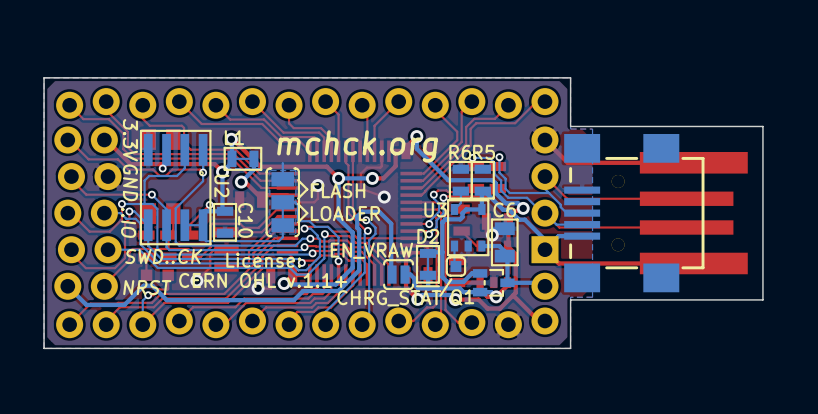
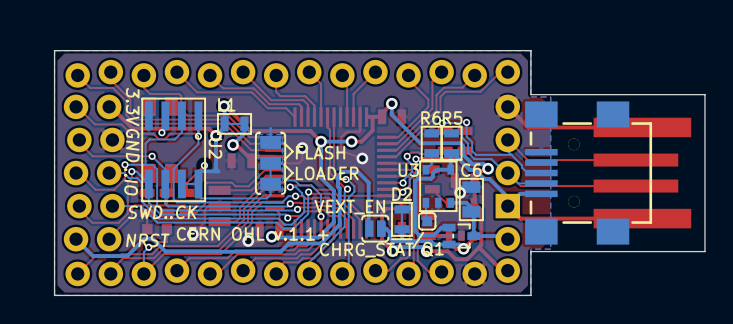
text: mchck.org (357, 146) -> none
C10: (225, 222) -> none
part value: EN_VRAW (371, 250) -> VEXT_EN (349, 207)
text: License: (263, 260) -> none

